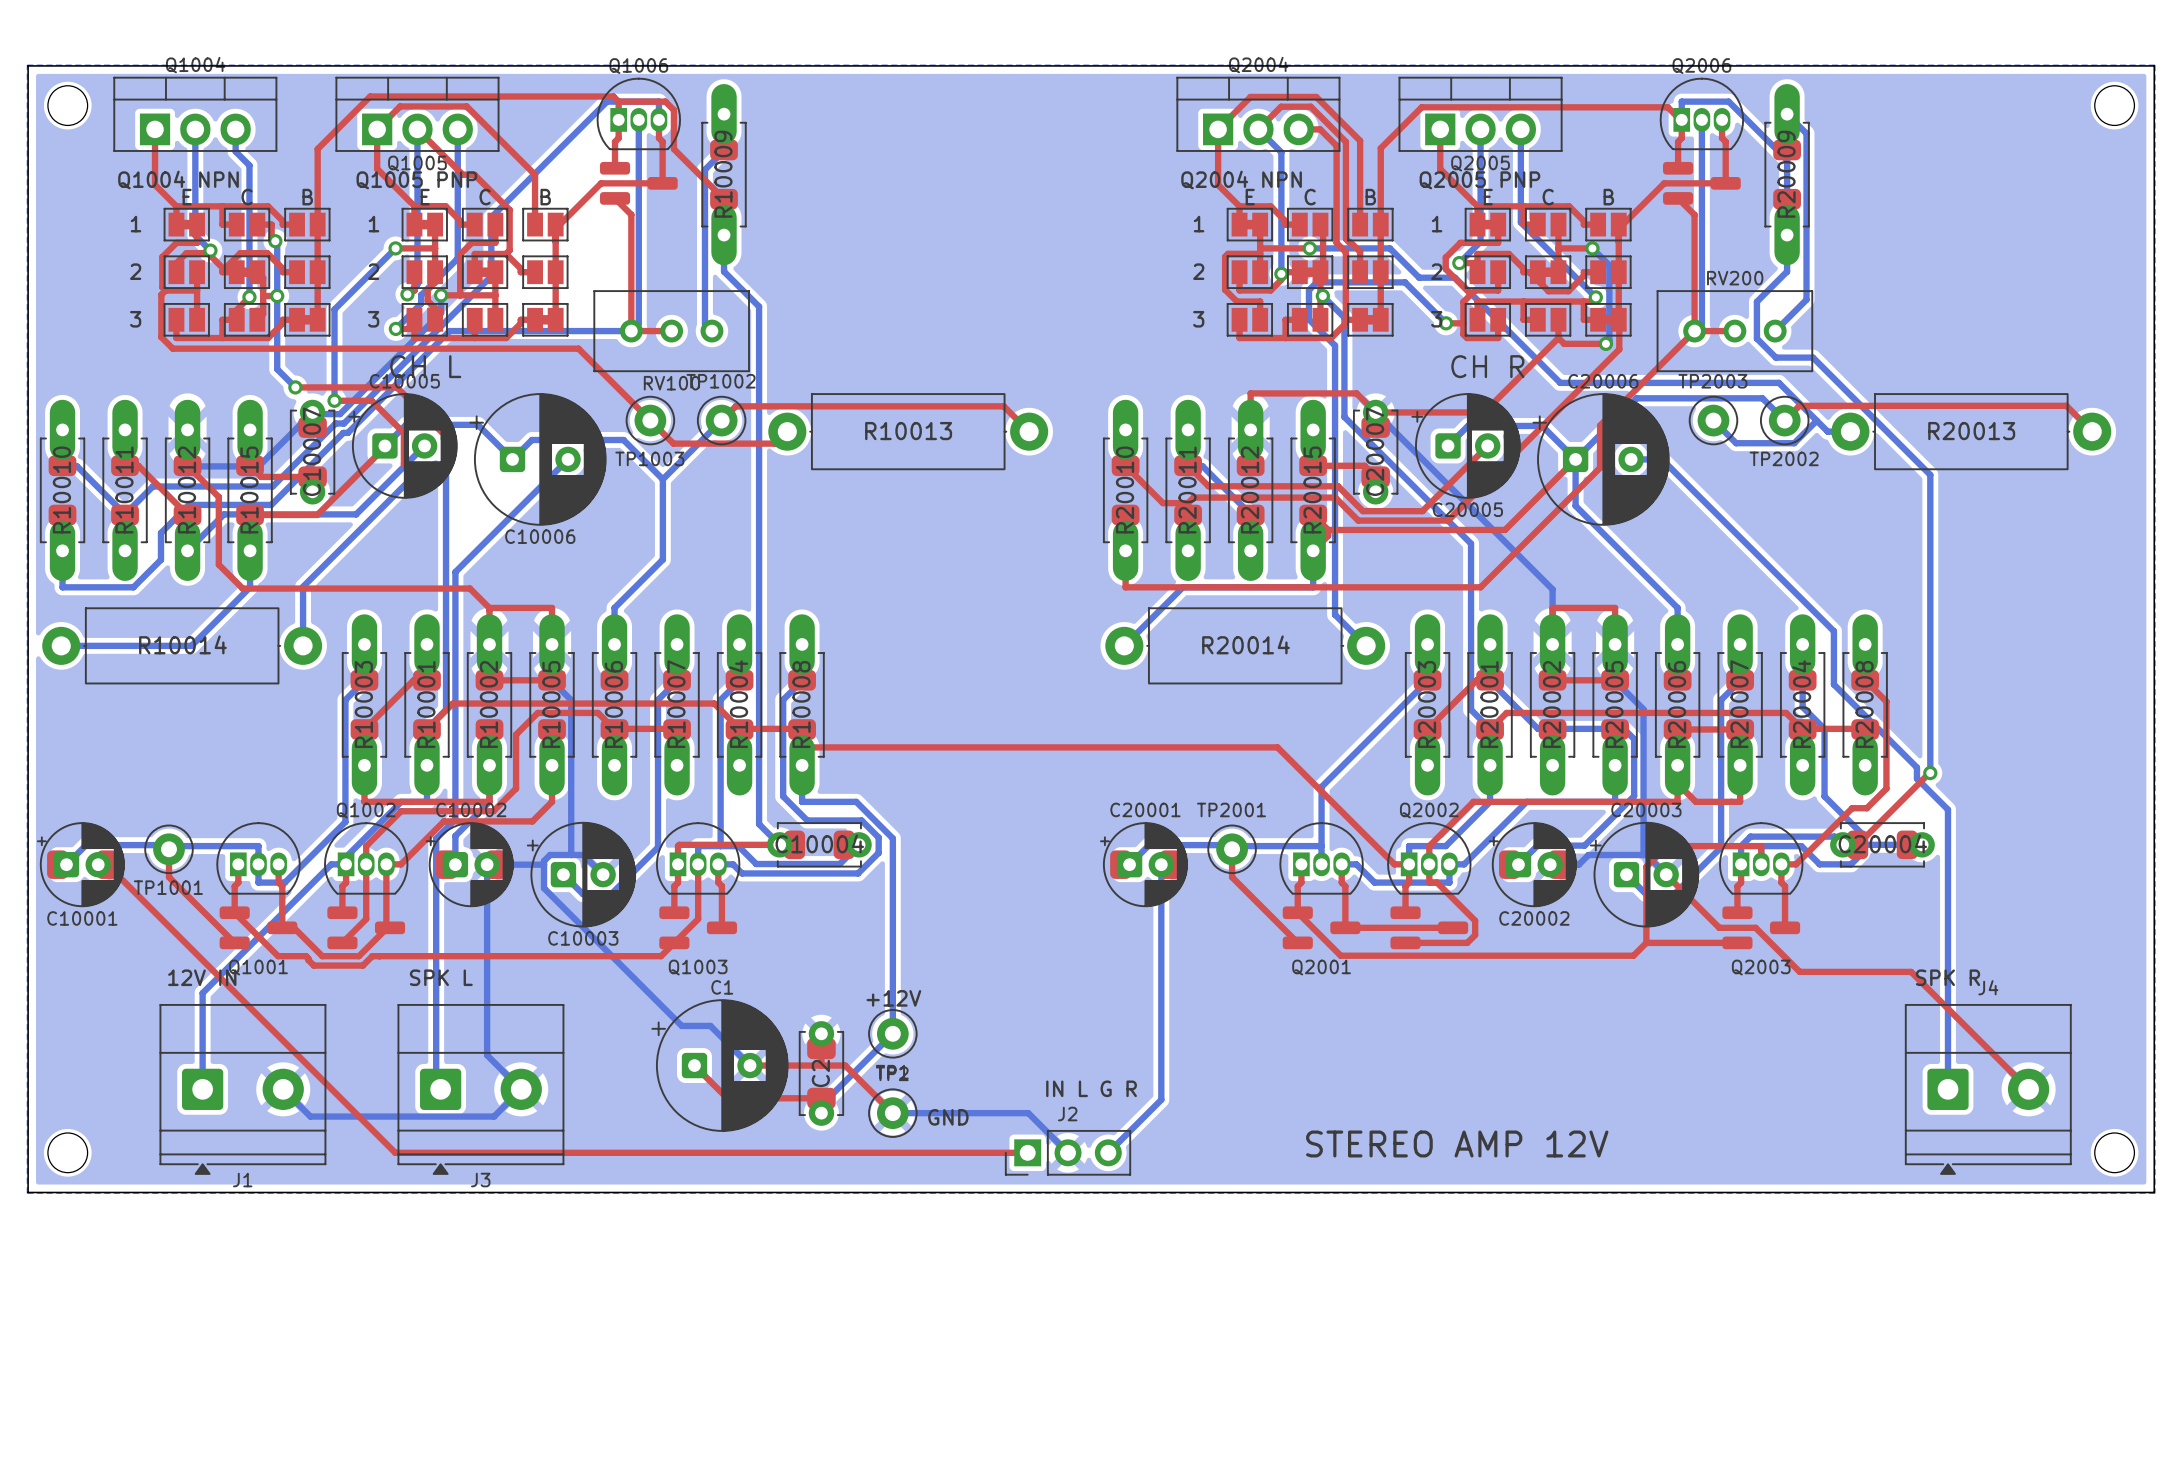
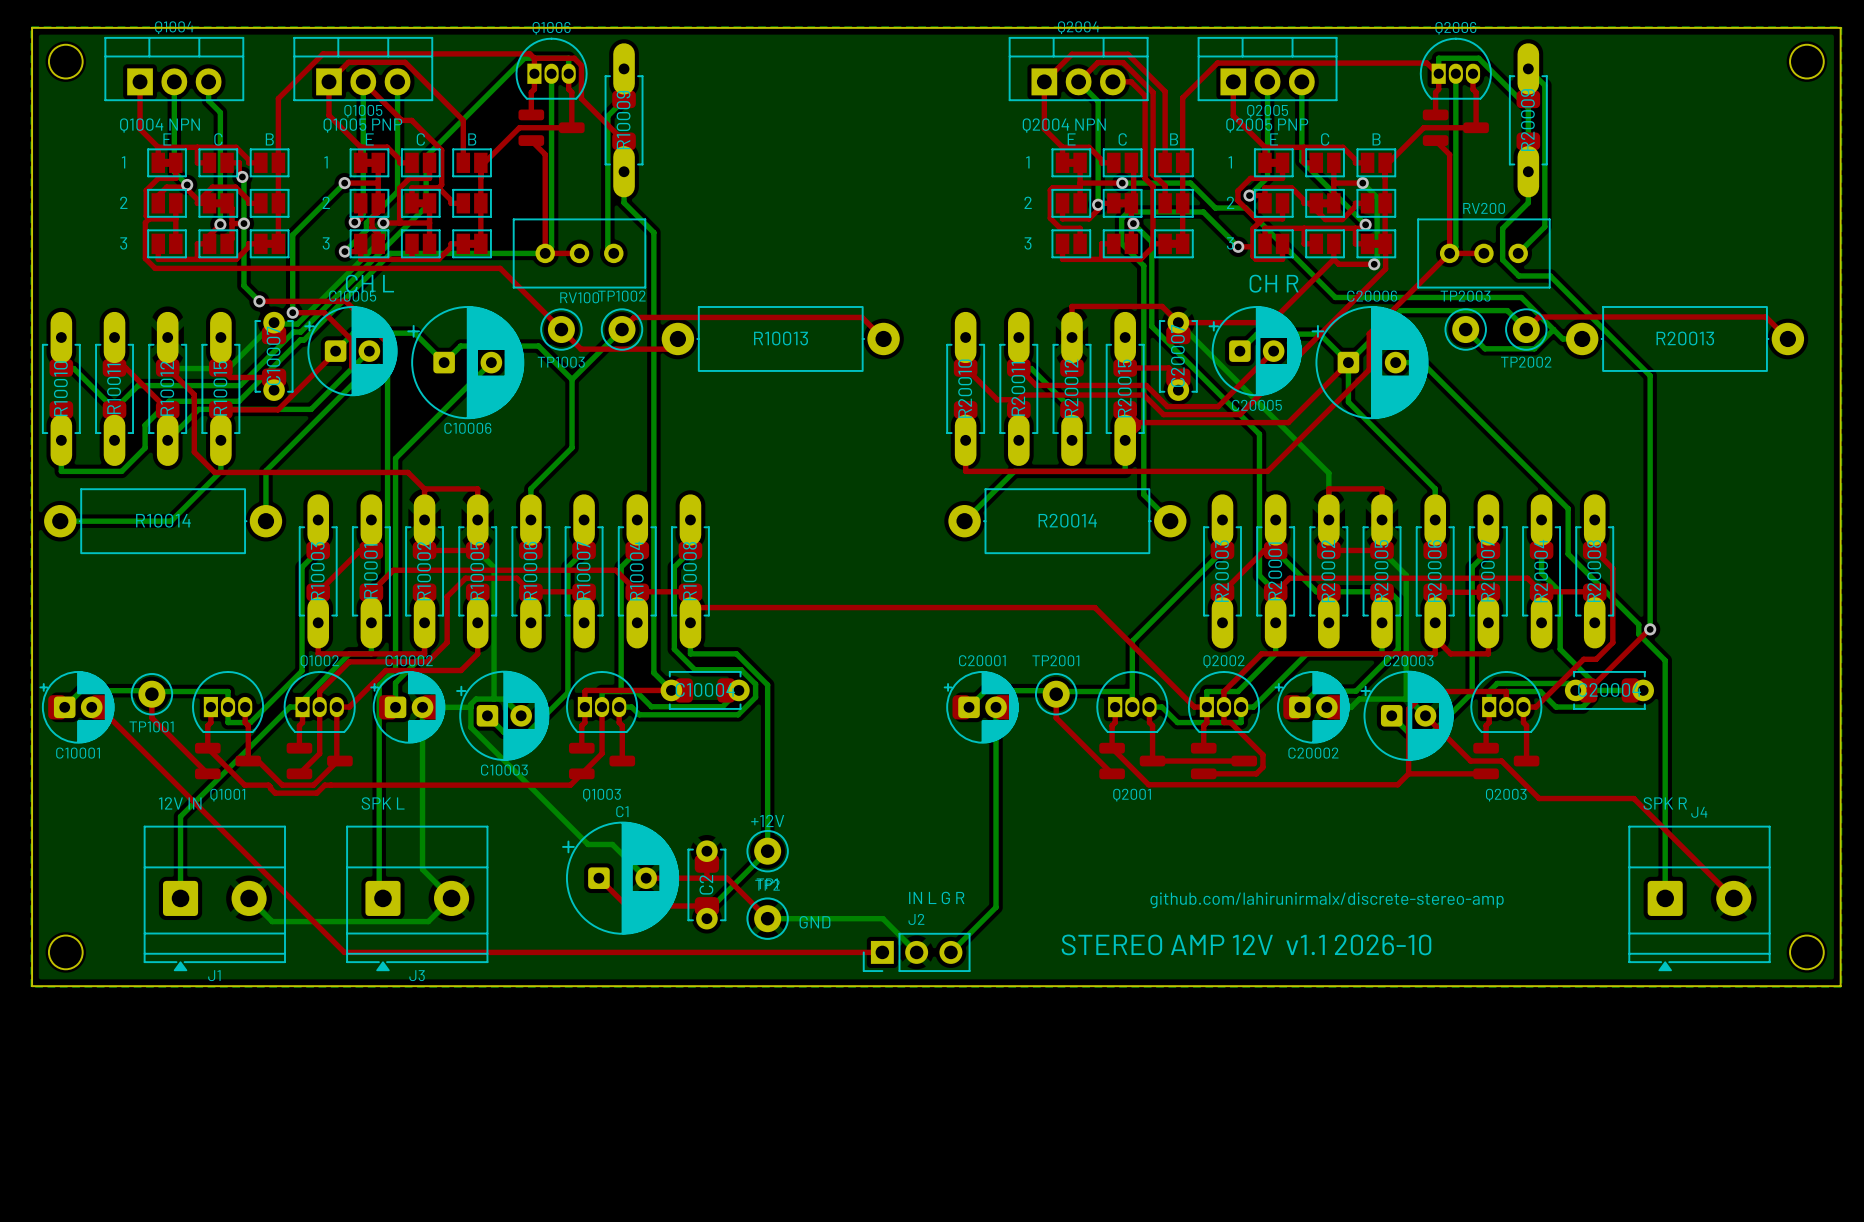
text: none -> github.com/lahirunirmalx/discrete-stereo-amp (1327, 900)
text: STEREO AMP 12V (1457, 1143) -> STEREO AMP 12V v1.1 2026-10 (1246, 944)

